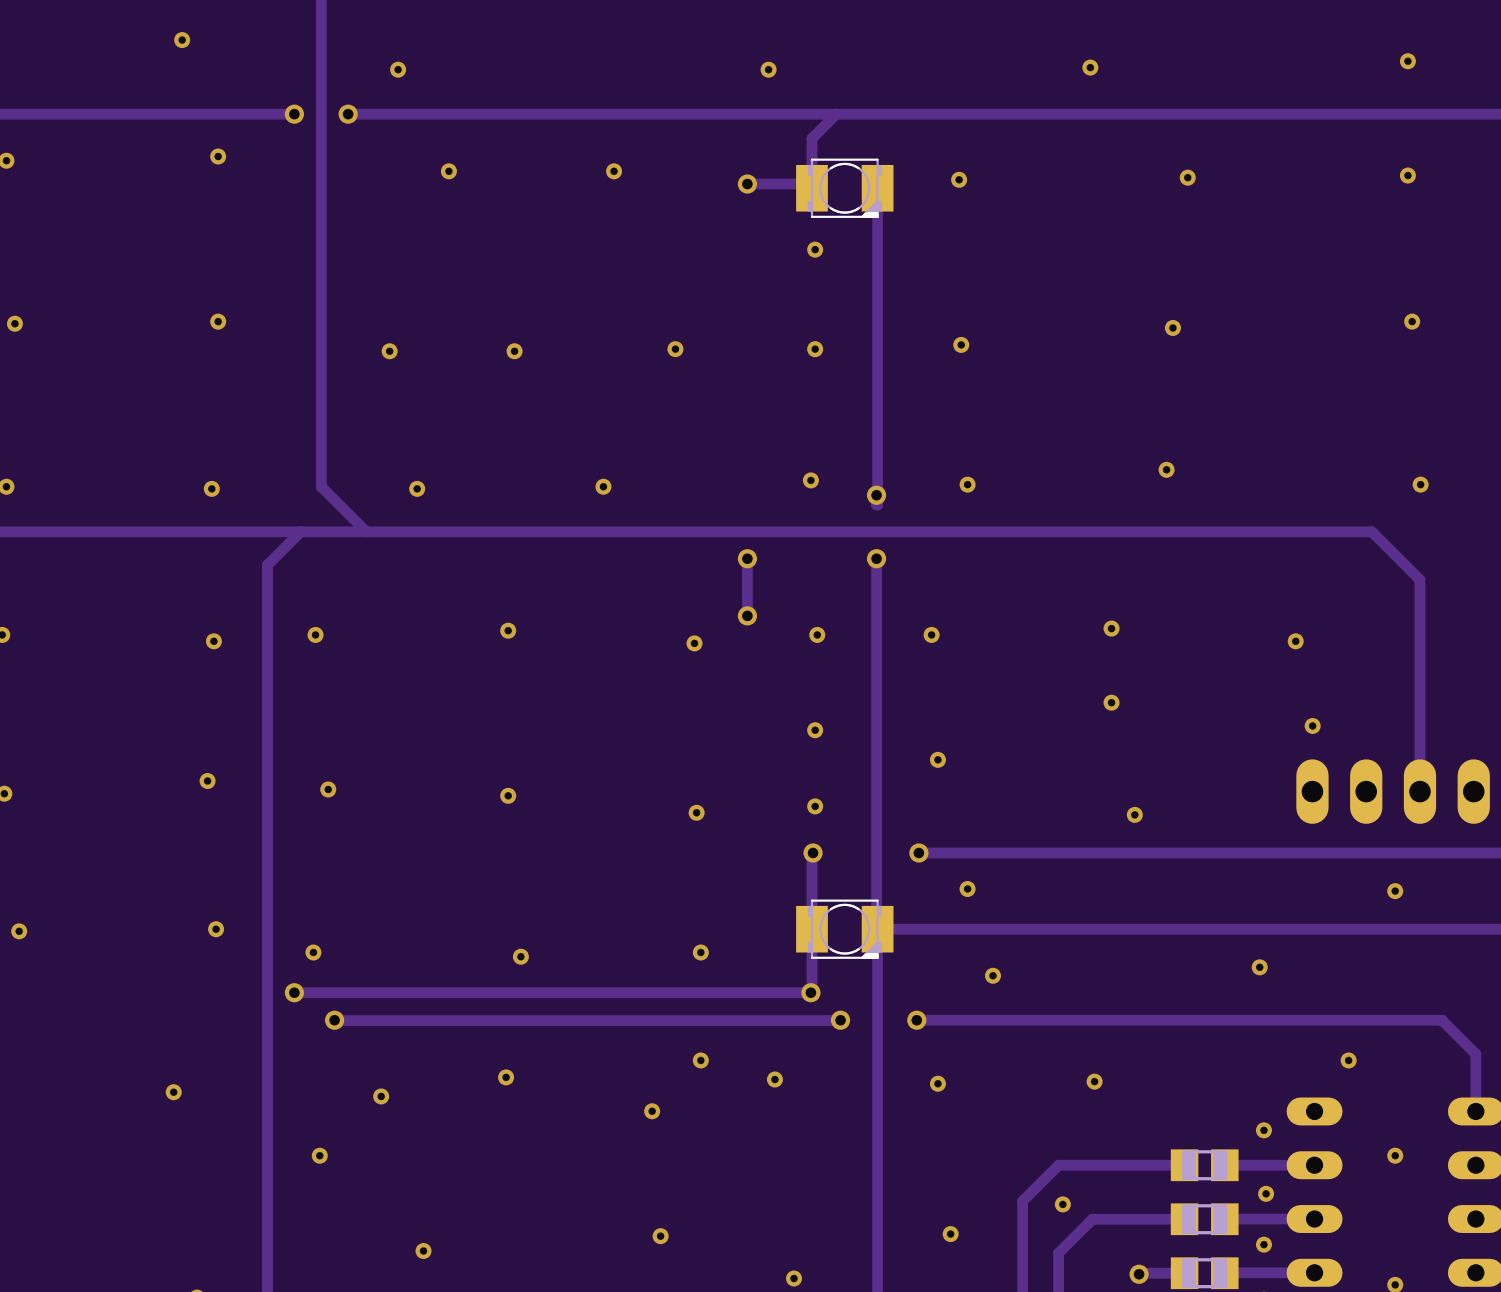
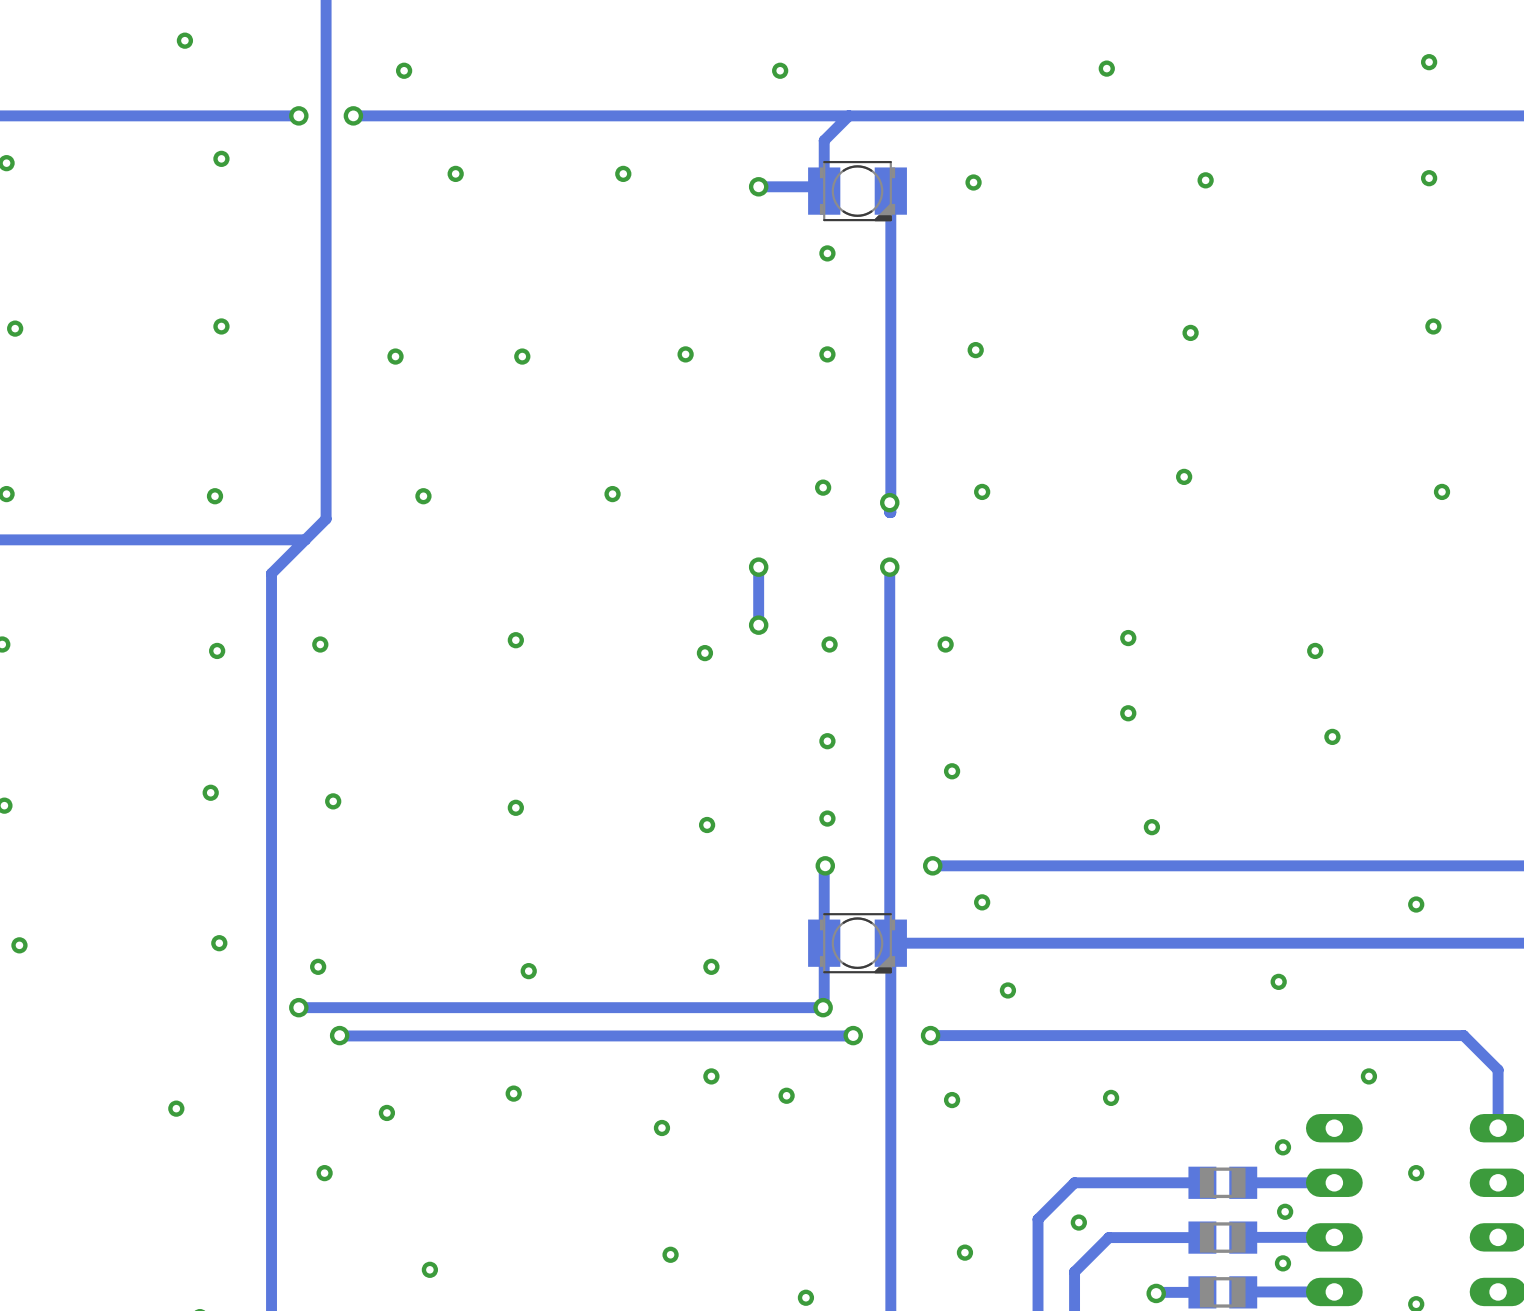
track: (321, 486) (366, 531) -> (326, 494) (326, 519) (305, 539)
track: (300, 531) (1371, 531) (1419, 579) (1419, 791) -> none
part: (1393, 791) -> none

